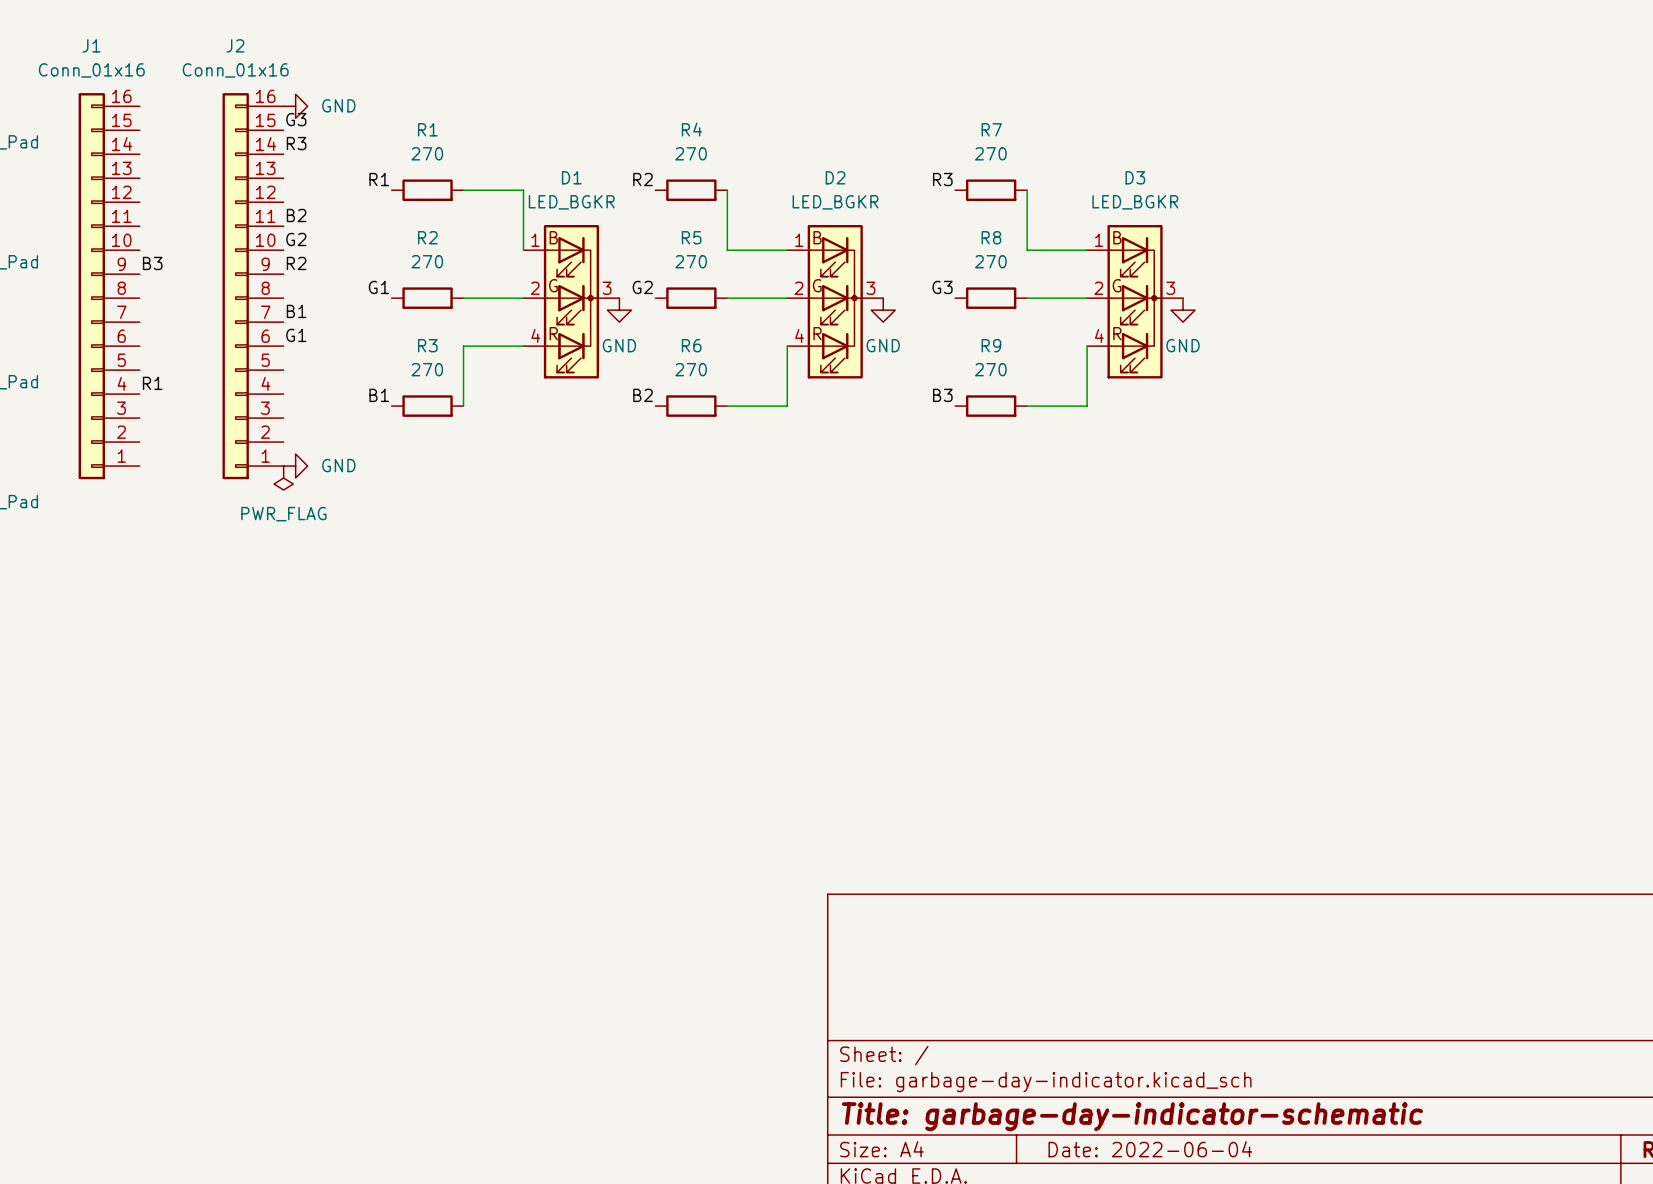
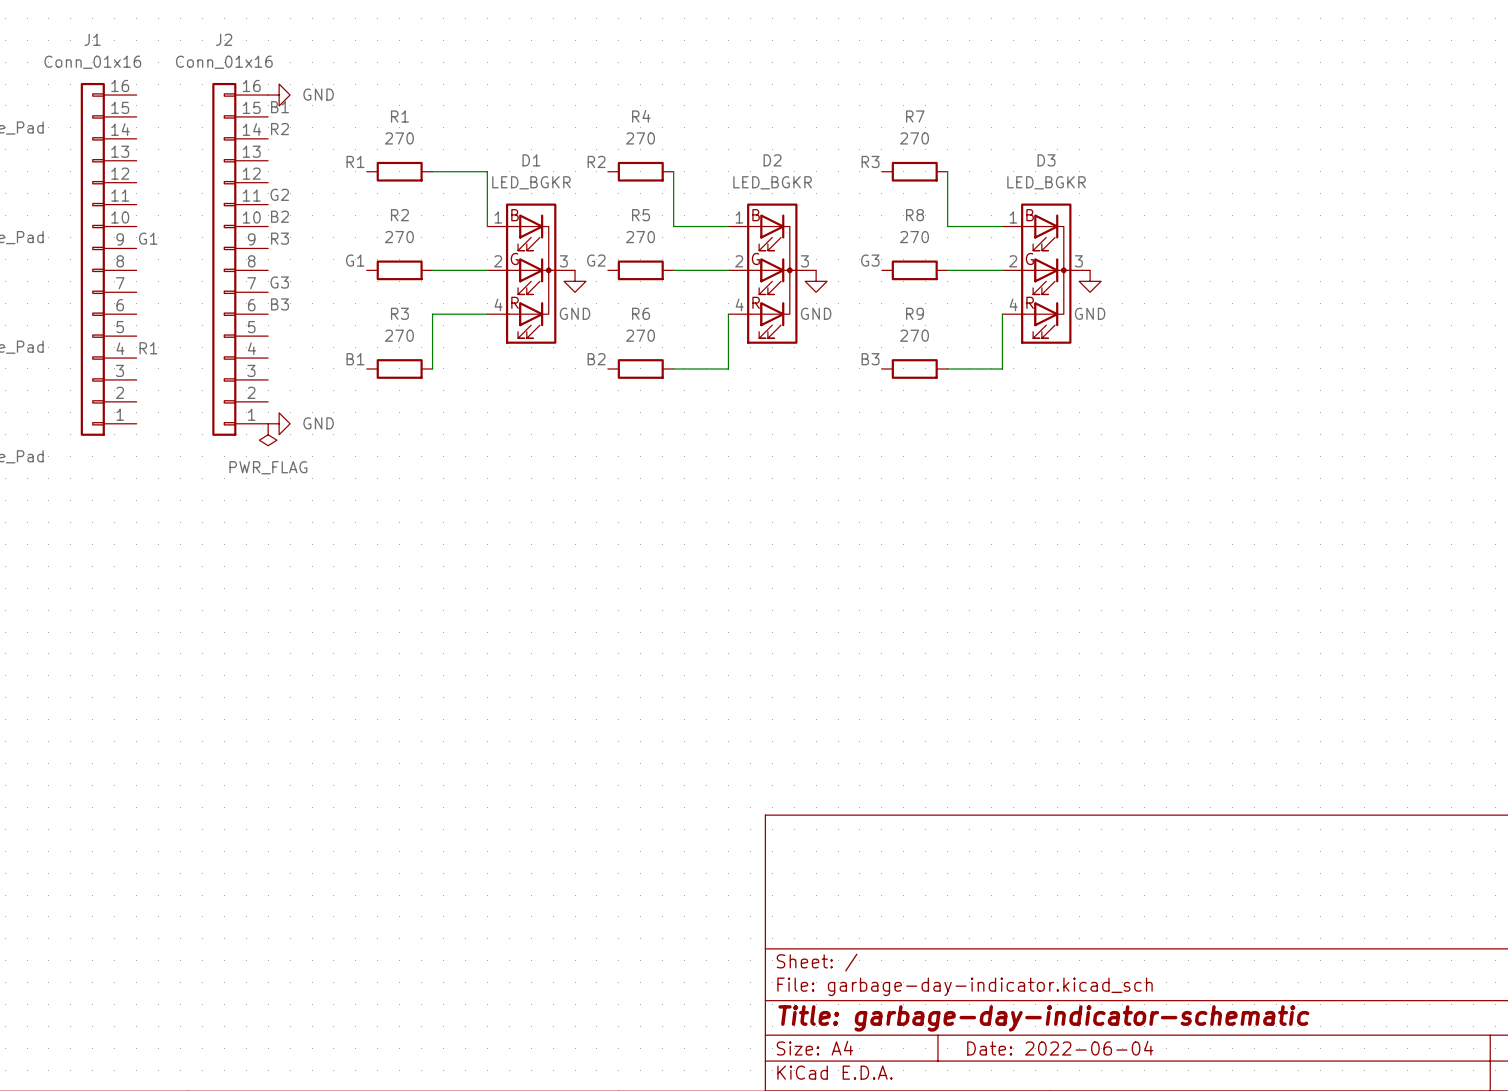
label: G3 (296, 119) -> B1 (279, 107)
label: R3 (296, 143) -> R2 (279, 129)
label: B2 (296, 215) -> G2 (279, 194)
label: G2 (296, 239) -> B2 (279, 216)
label: B3 (152, 263) -> G1 (148, 238)
label: R2 (296, 263) -> R3 (279, 238)
label: B1 (296, 311) -> G3 (279, 282)
label: G1 (296, 335) -> B3 (279, 304)

